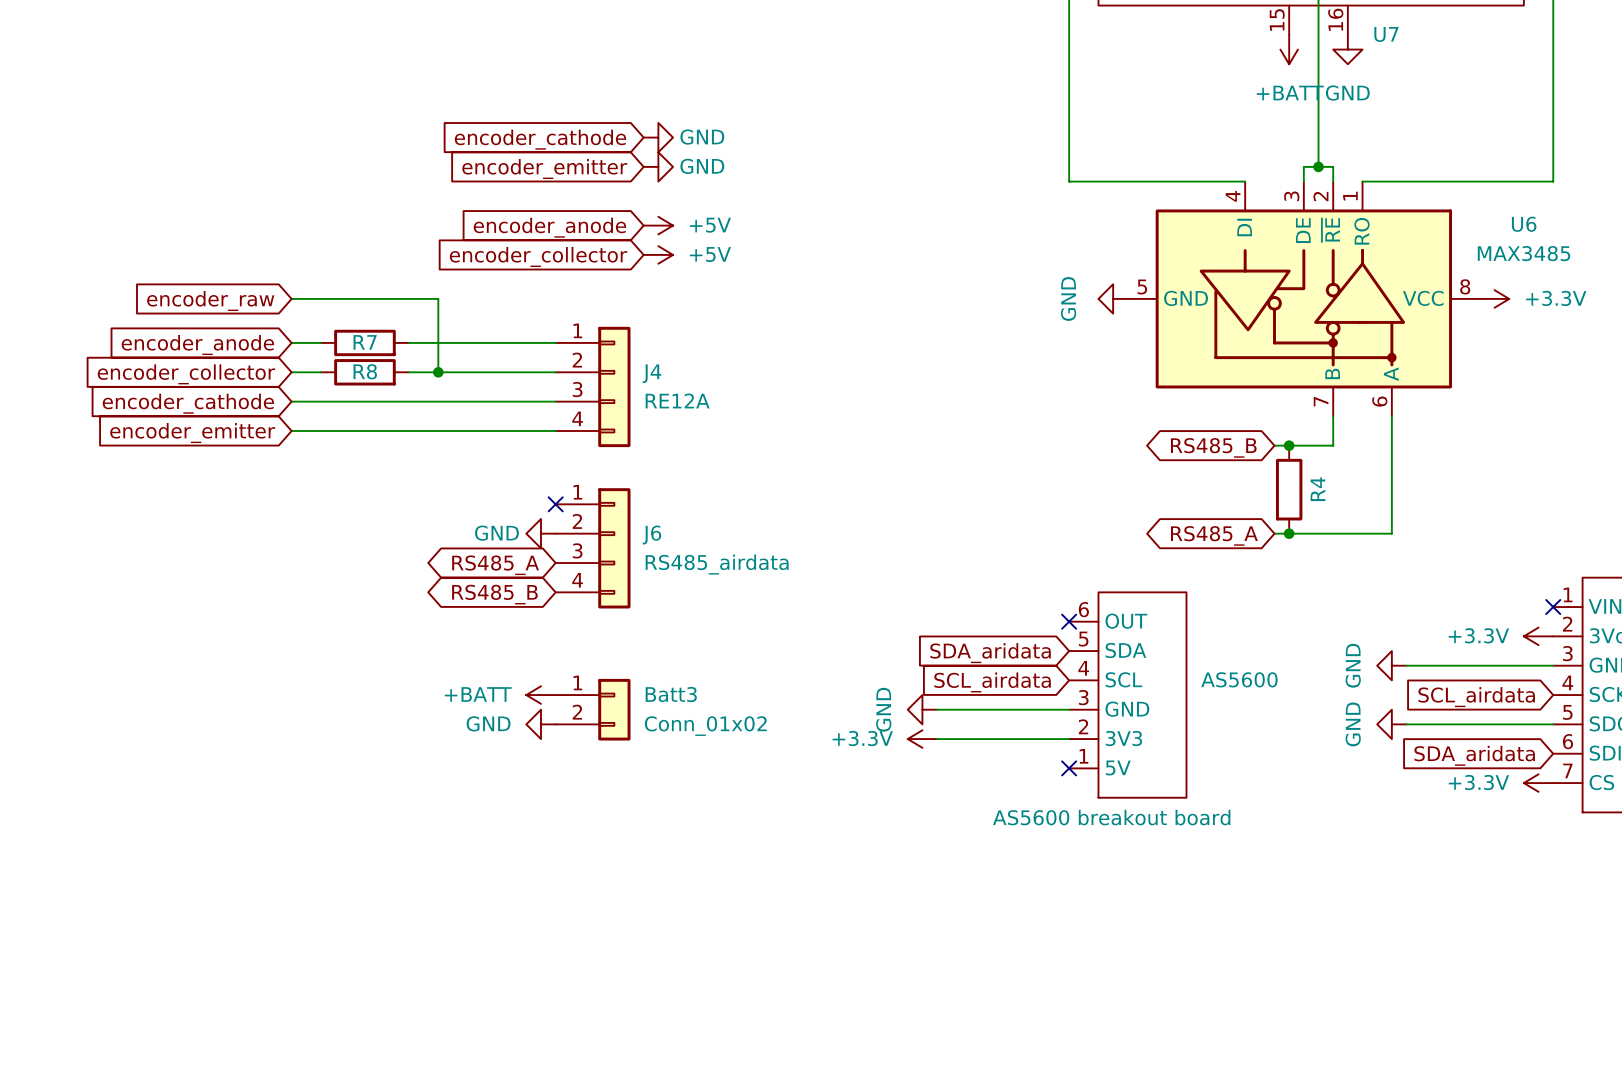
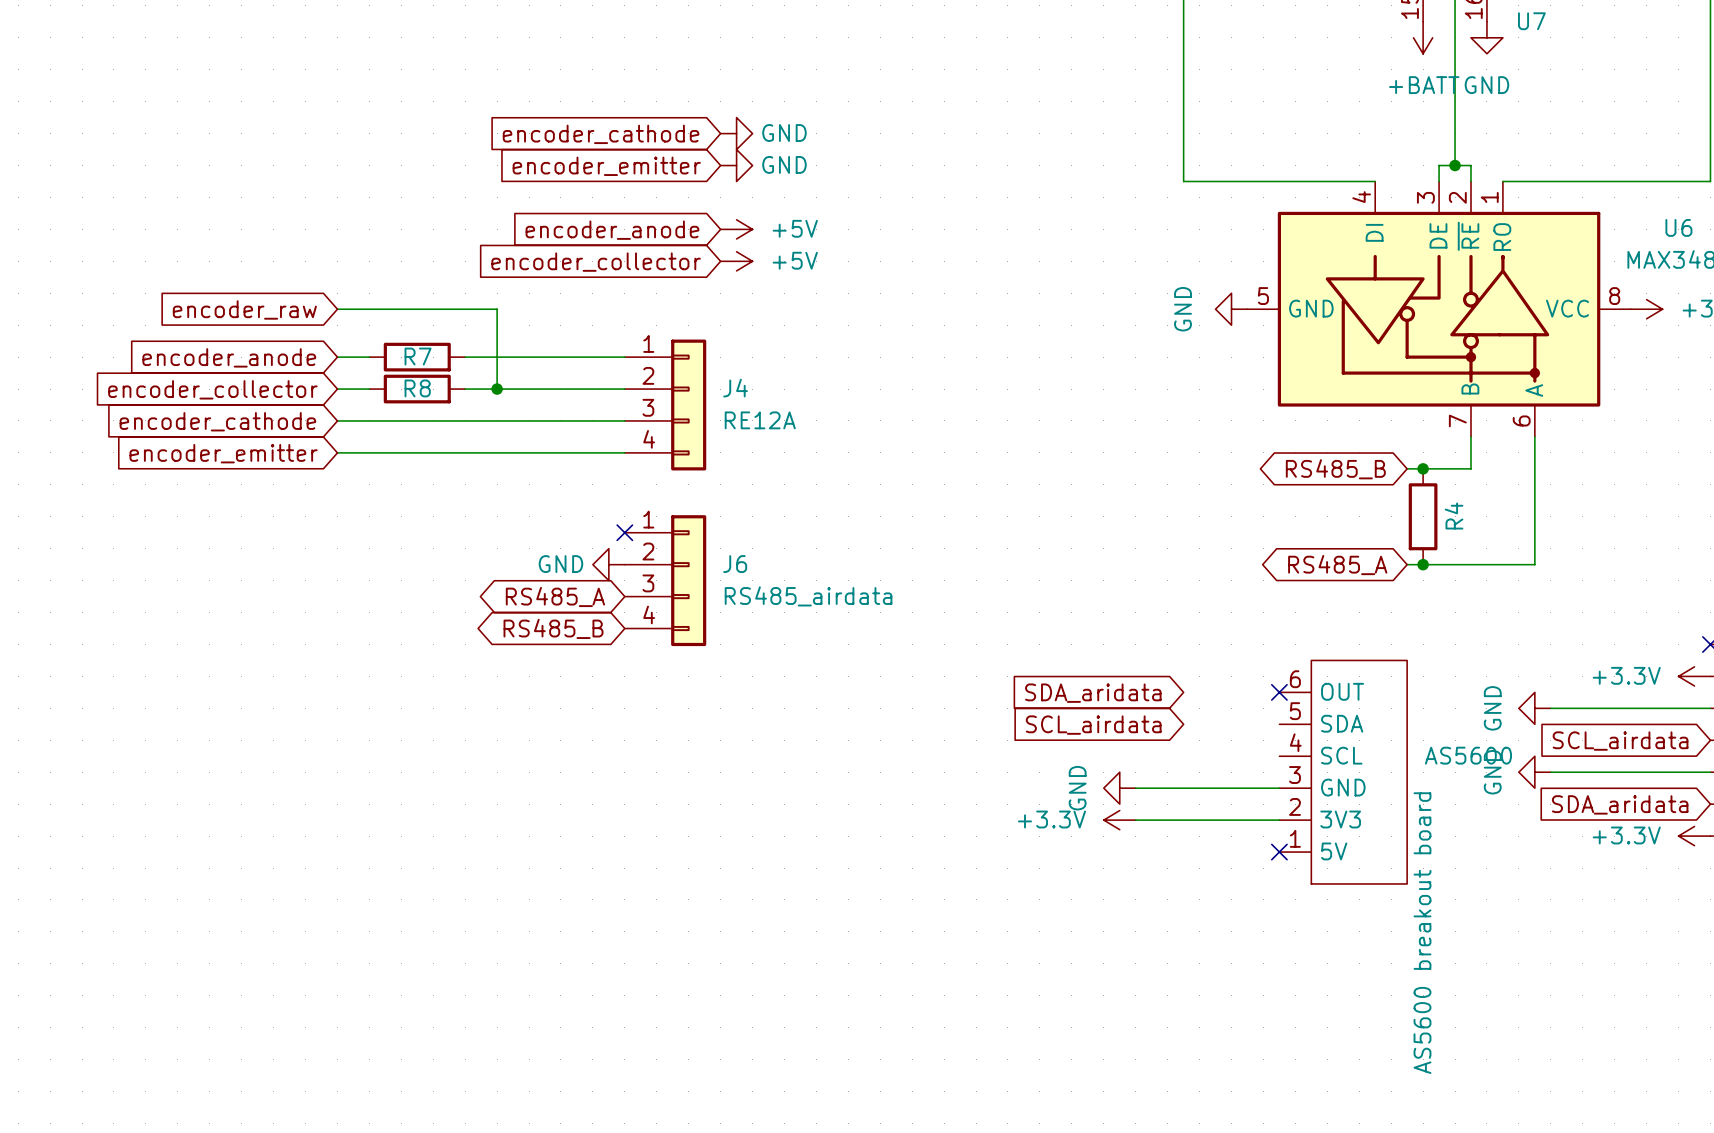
no-connect mark: (1069, 621) -> none
no-connect mark: none -> (1279, 692)
power symbol: +BATT (541, 695) -> none
AS5600 position: (1127, 695) -> (1343, 772)
Batt3: Conn_01x02 (593, 709) -> none
power symbol position: GND (922, 709) -> GND (1119, 788)
wire: (937, 709) (1069, 709) -> (1135, 820) (1279, 820)
power symbol: GND (541, 724) -> none
power symbol position: +3.3V (922, 739) -> +3.3V (1119, 820)
wire: (937, 739) (1025, 739) -> (1183, 788) (1279, 788)
no-connect mark: (1069, 768) -> none
no-connect mark: none -> (1279, 852)
AS5600 value rotation: 0° (1111, 817) -> 90° counterclockwise (1422, 933)

